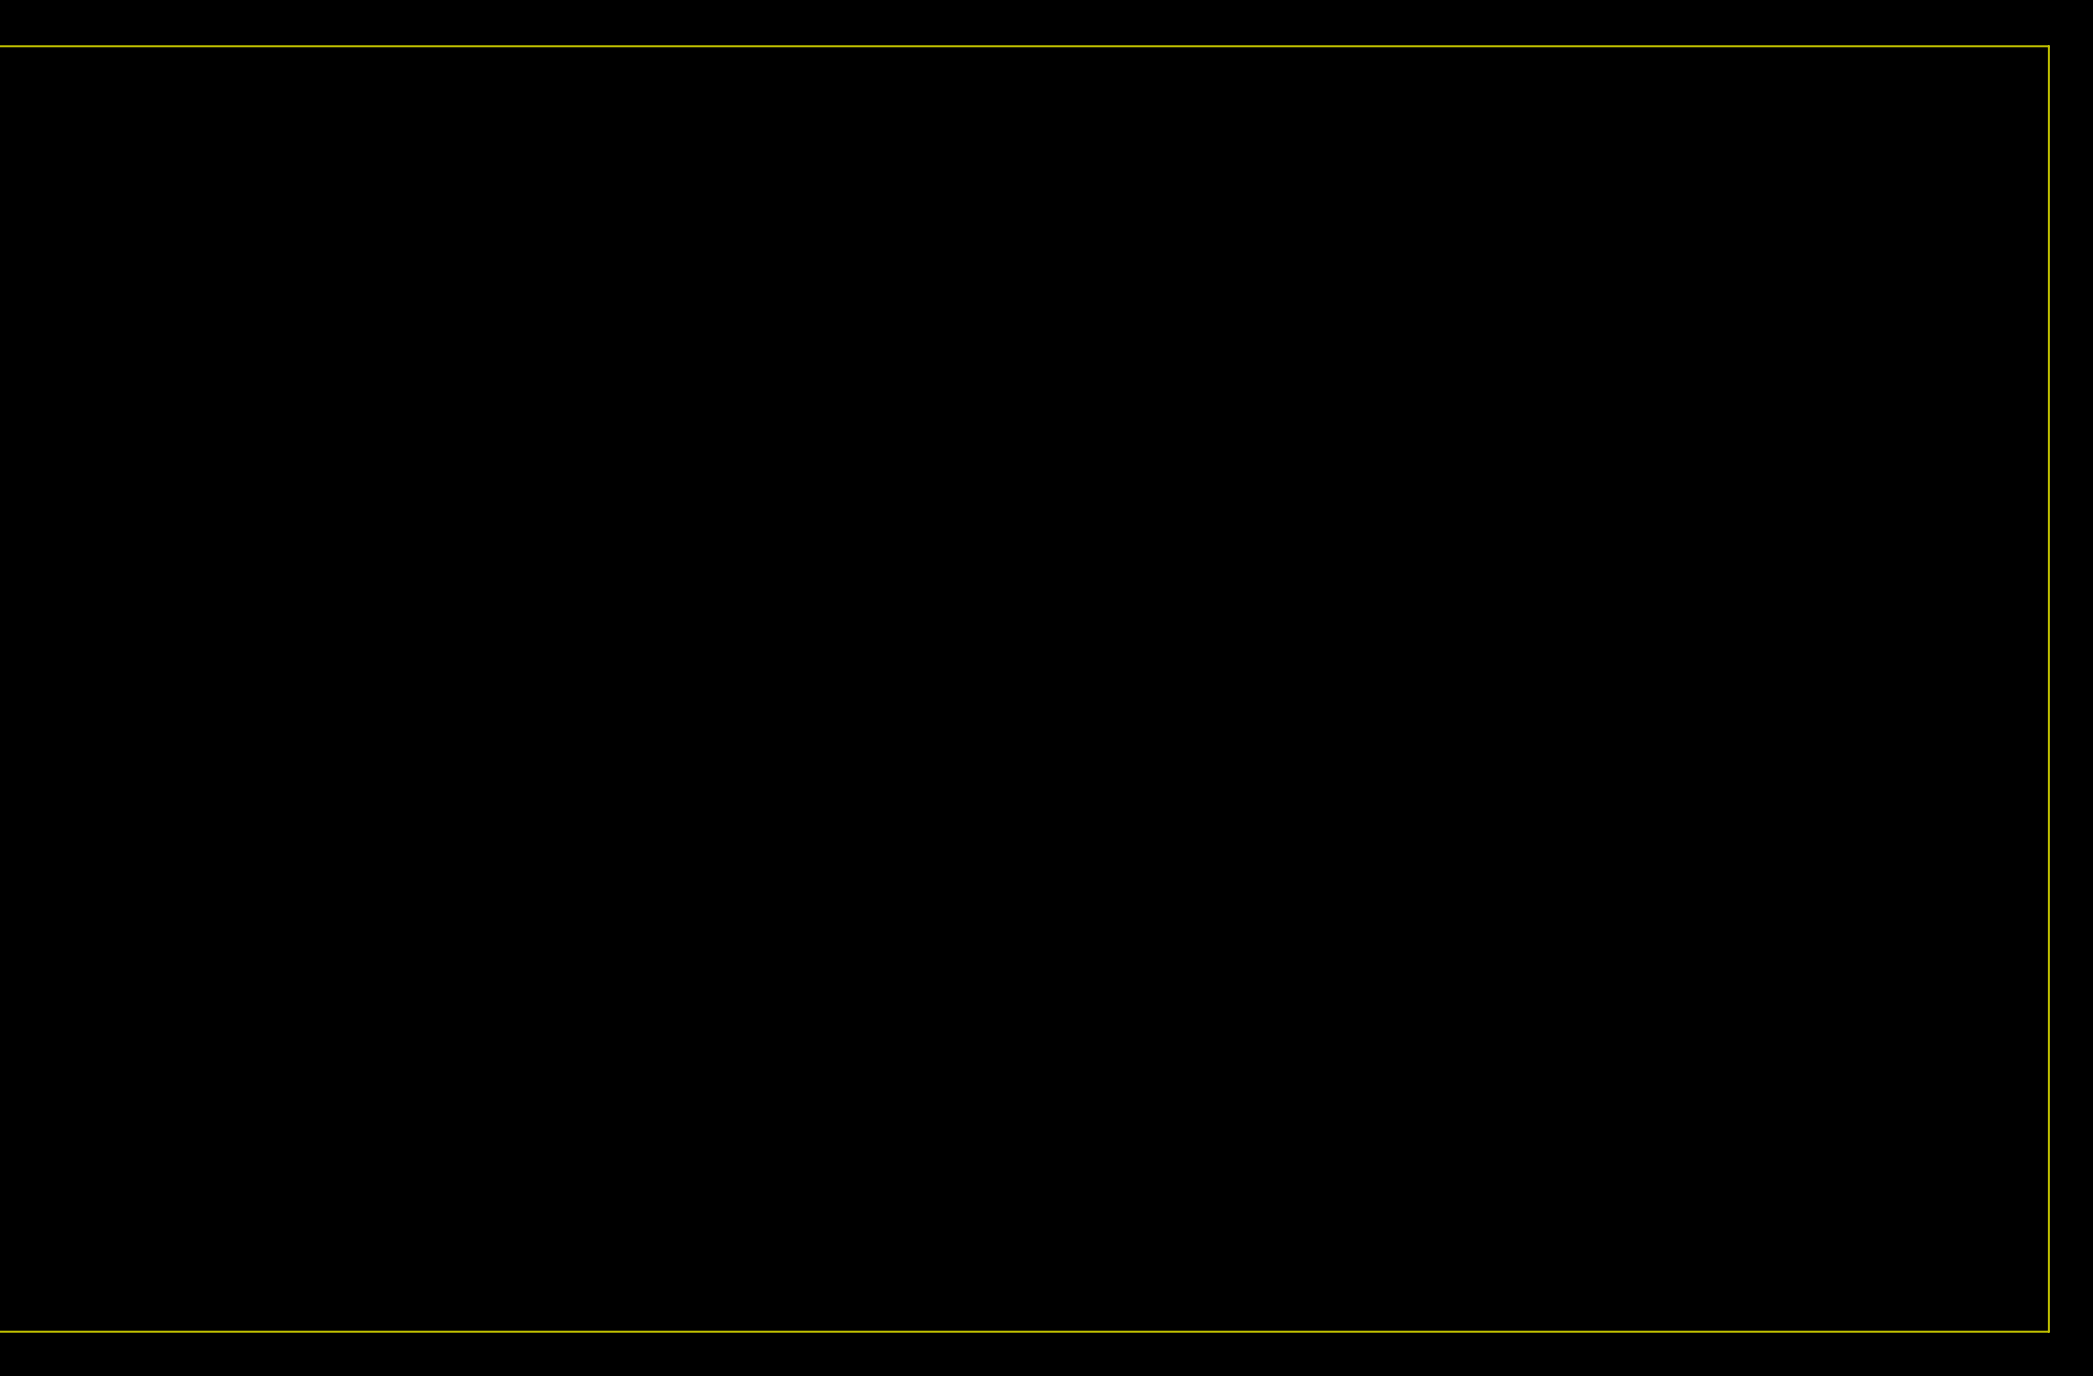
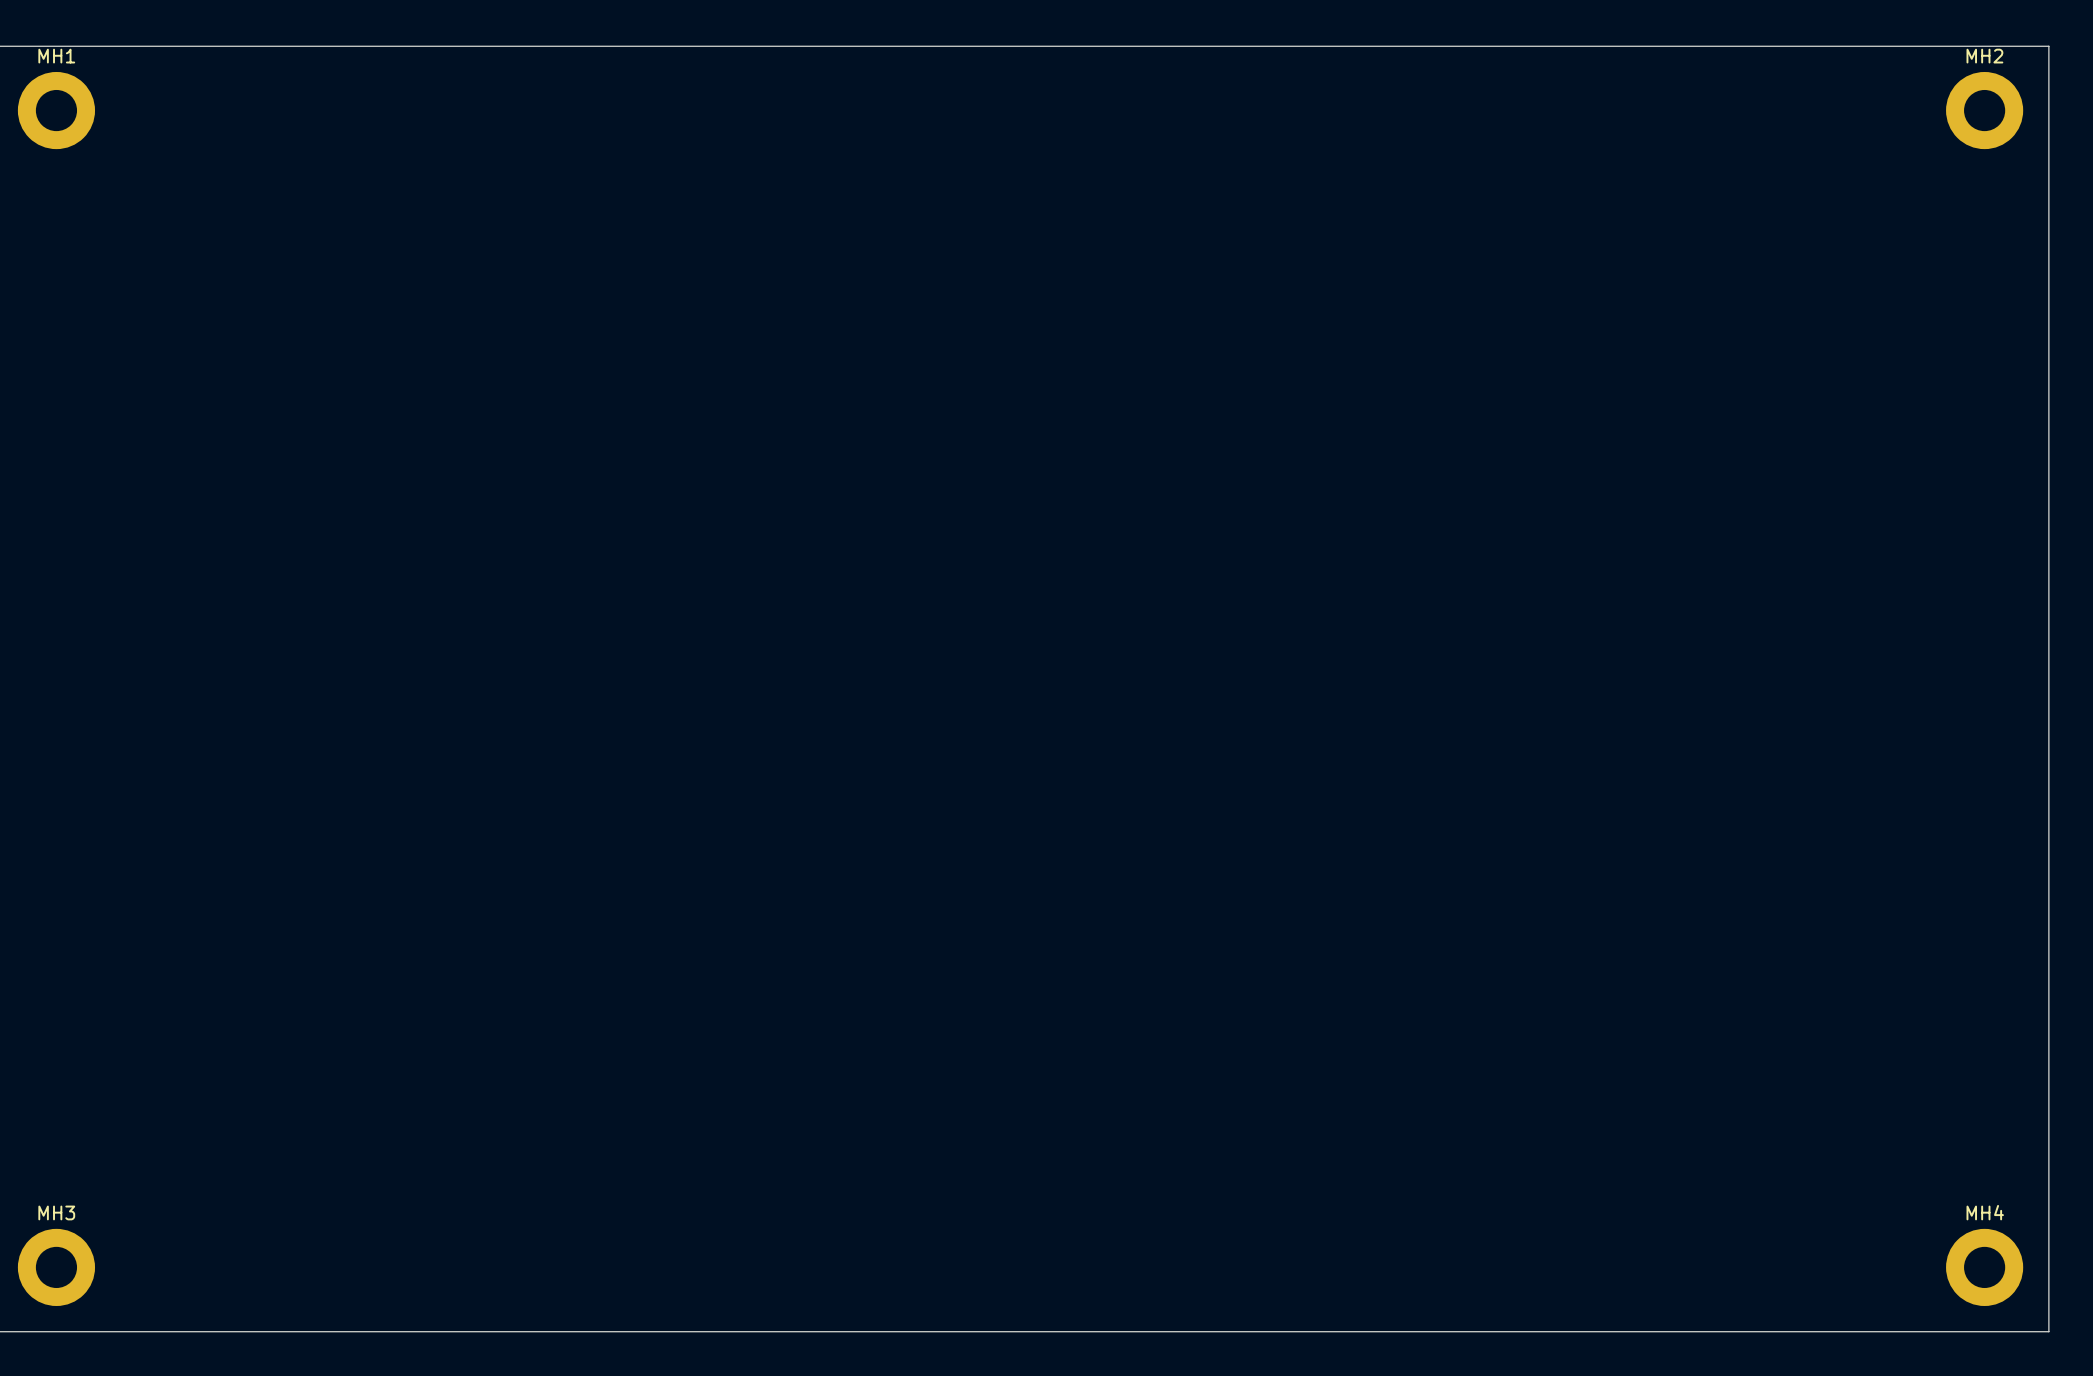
MH1: none -> (56, 110)
MH2: none -> (1984, 110)
MH3: none -> (56, 1267)
MH4: none -> (1984, 1267)

